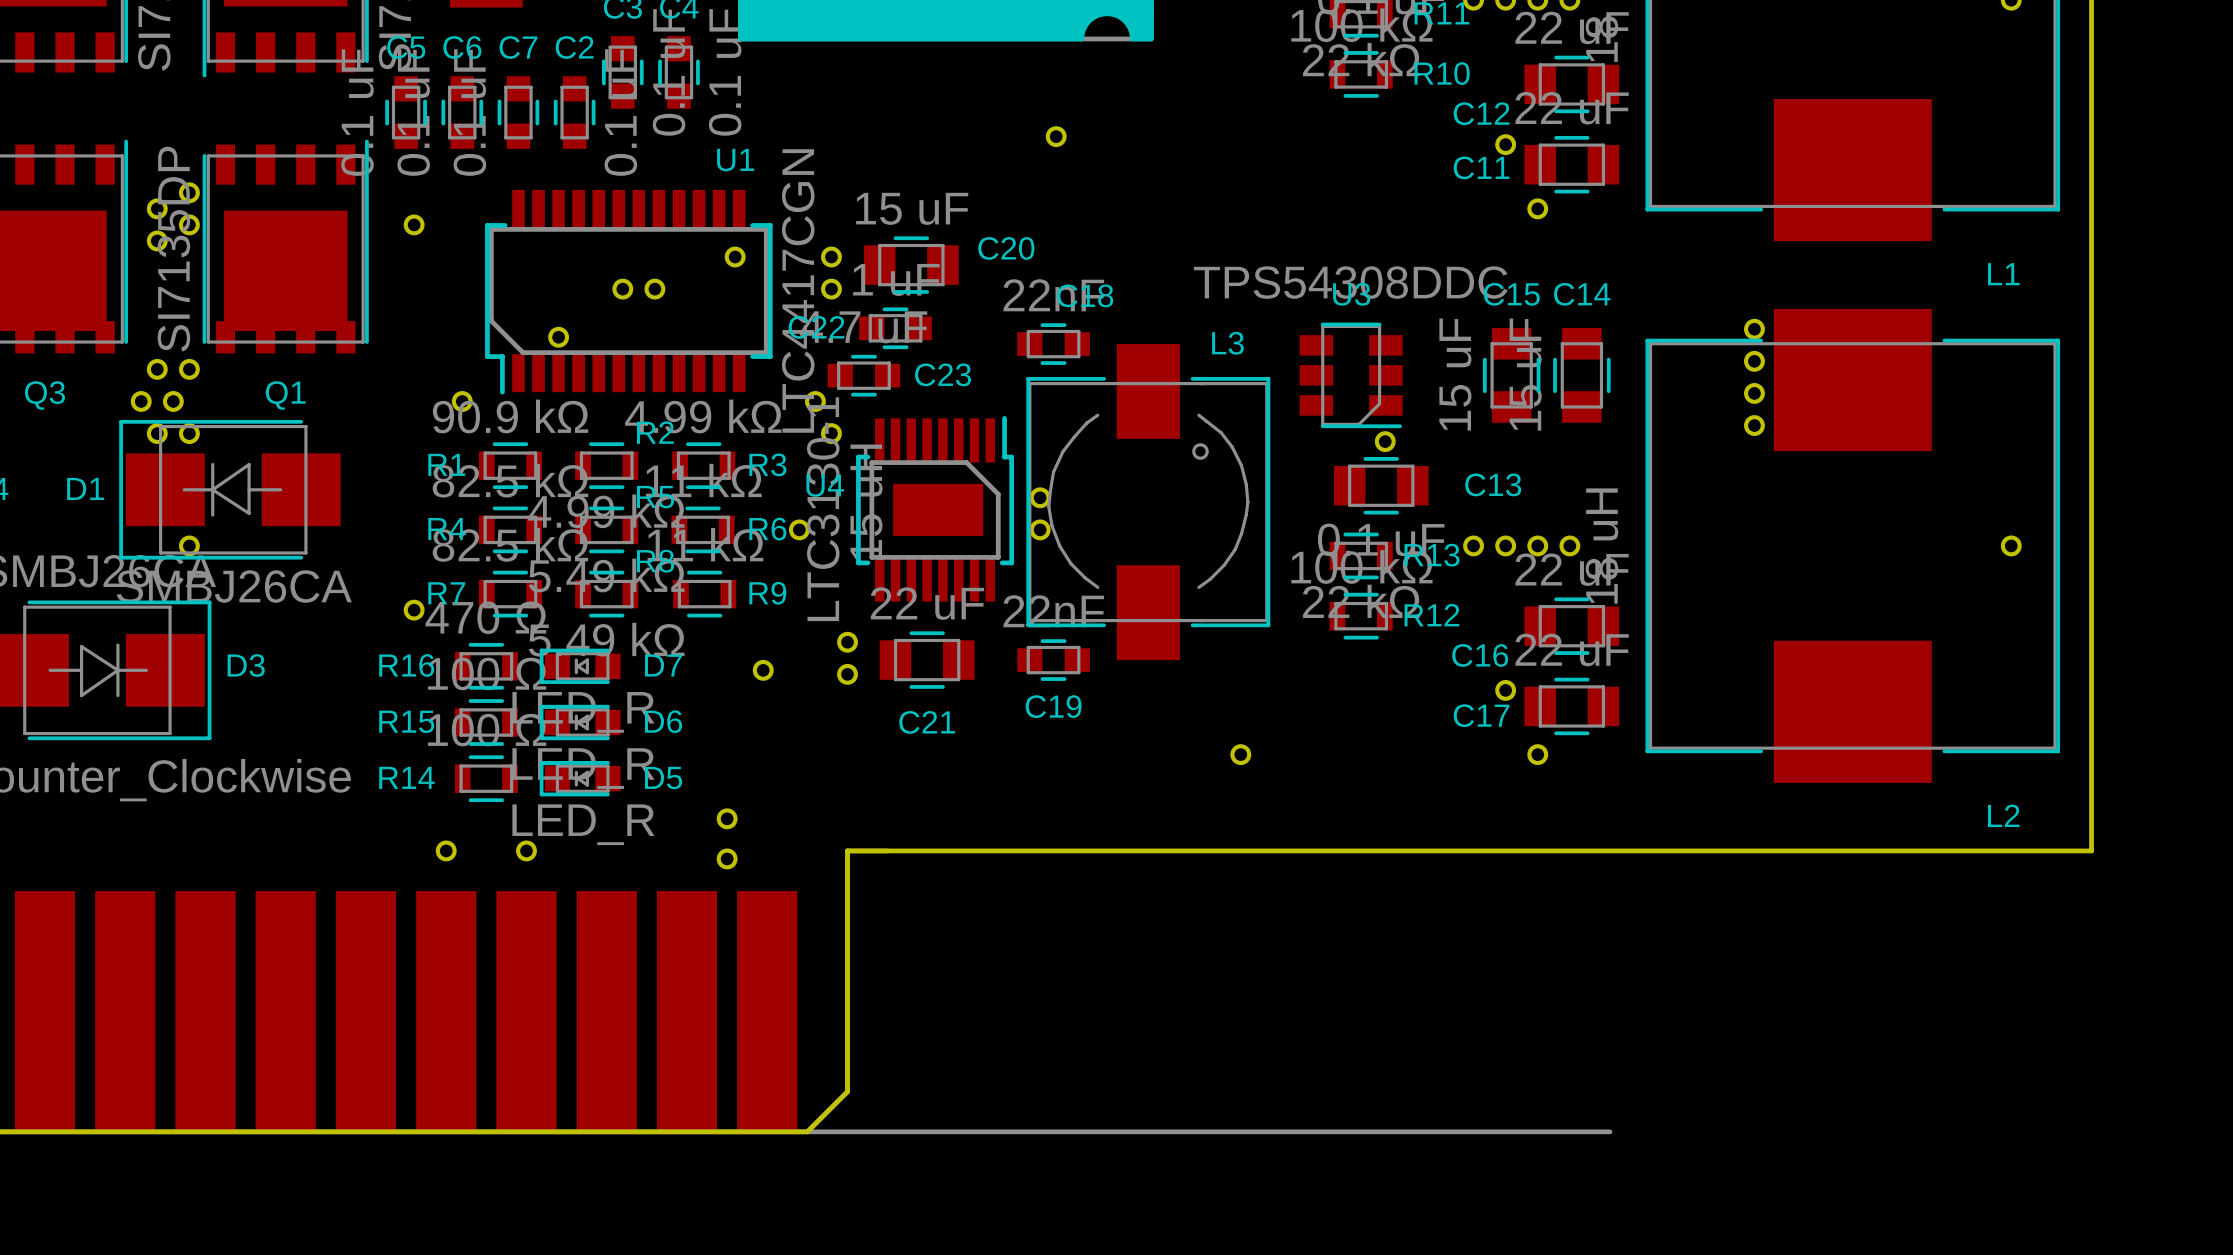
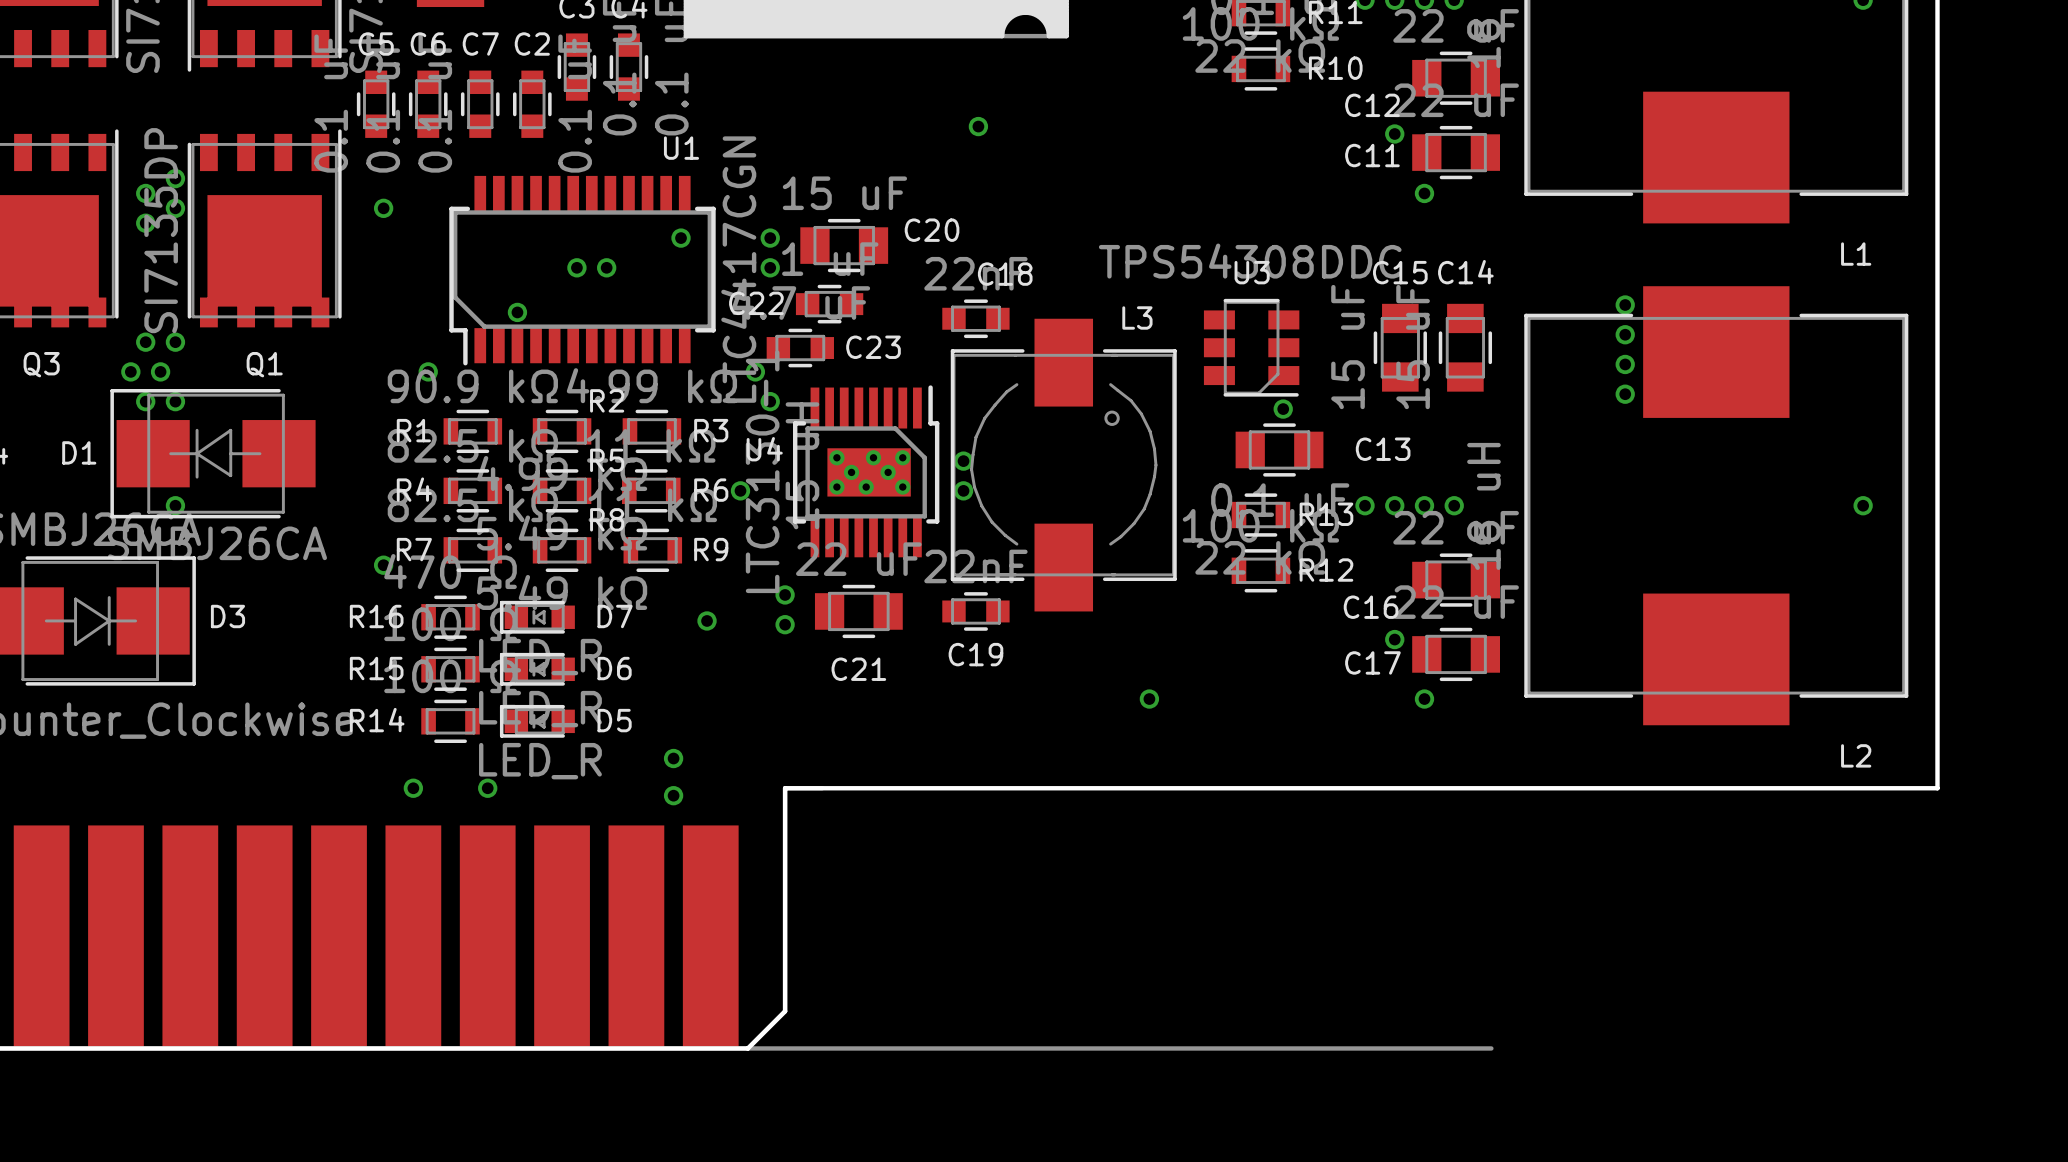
part: none -> (836, 457)
part: none -> (873, 457)
part: none -> (902, 457)
part: none -> (851, 472)
part: none -> (888, 472)
part: none -> (836, 487)
part: none -> (866, 487)
part: none -> (902, 487)

